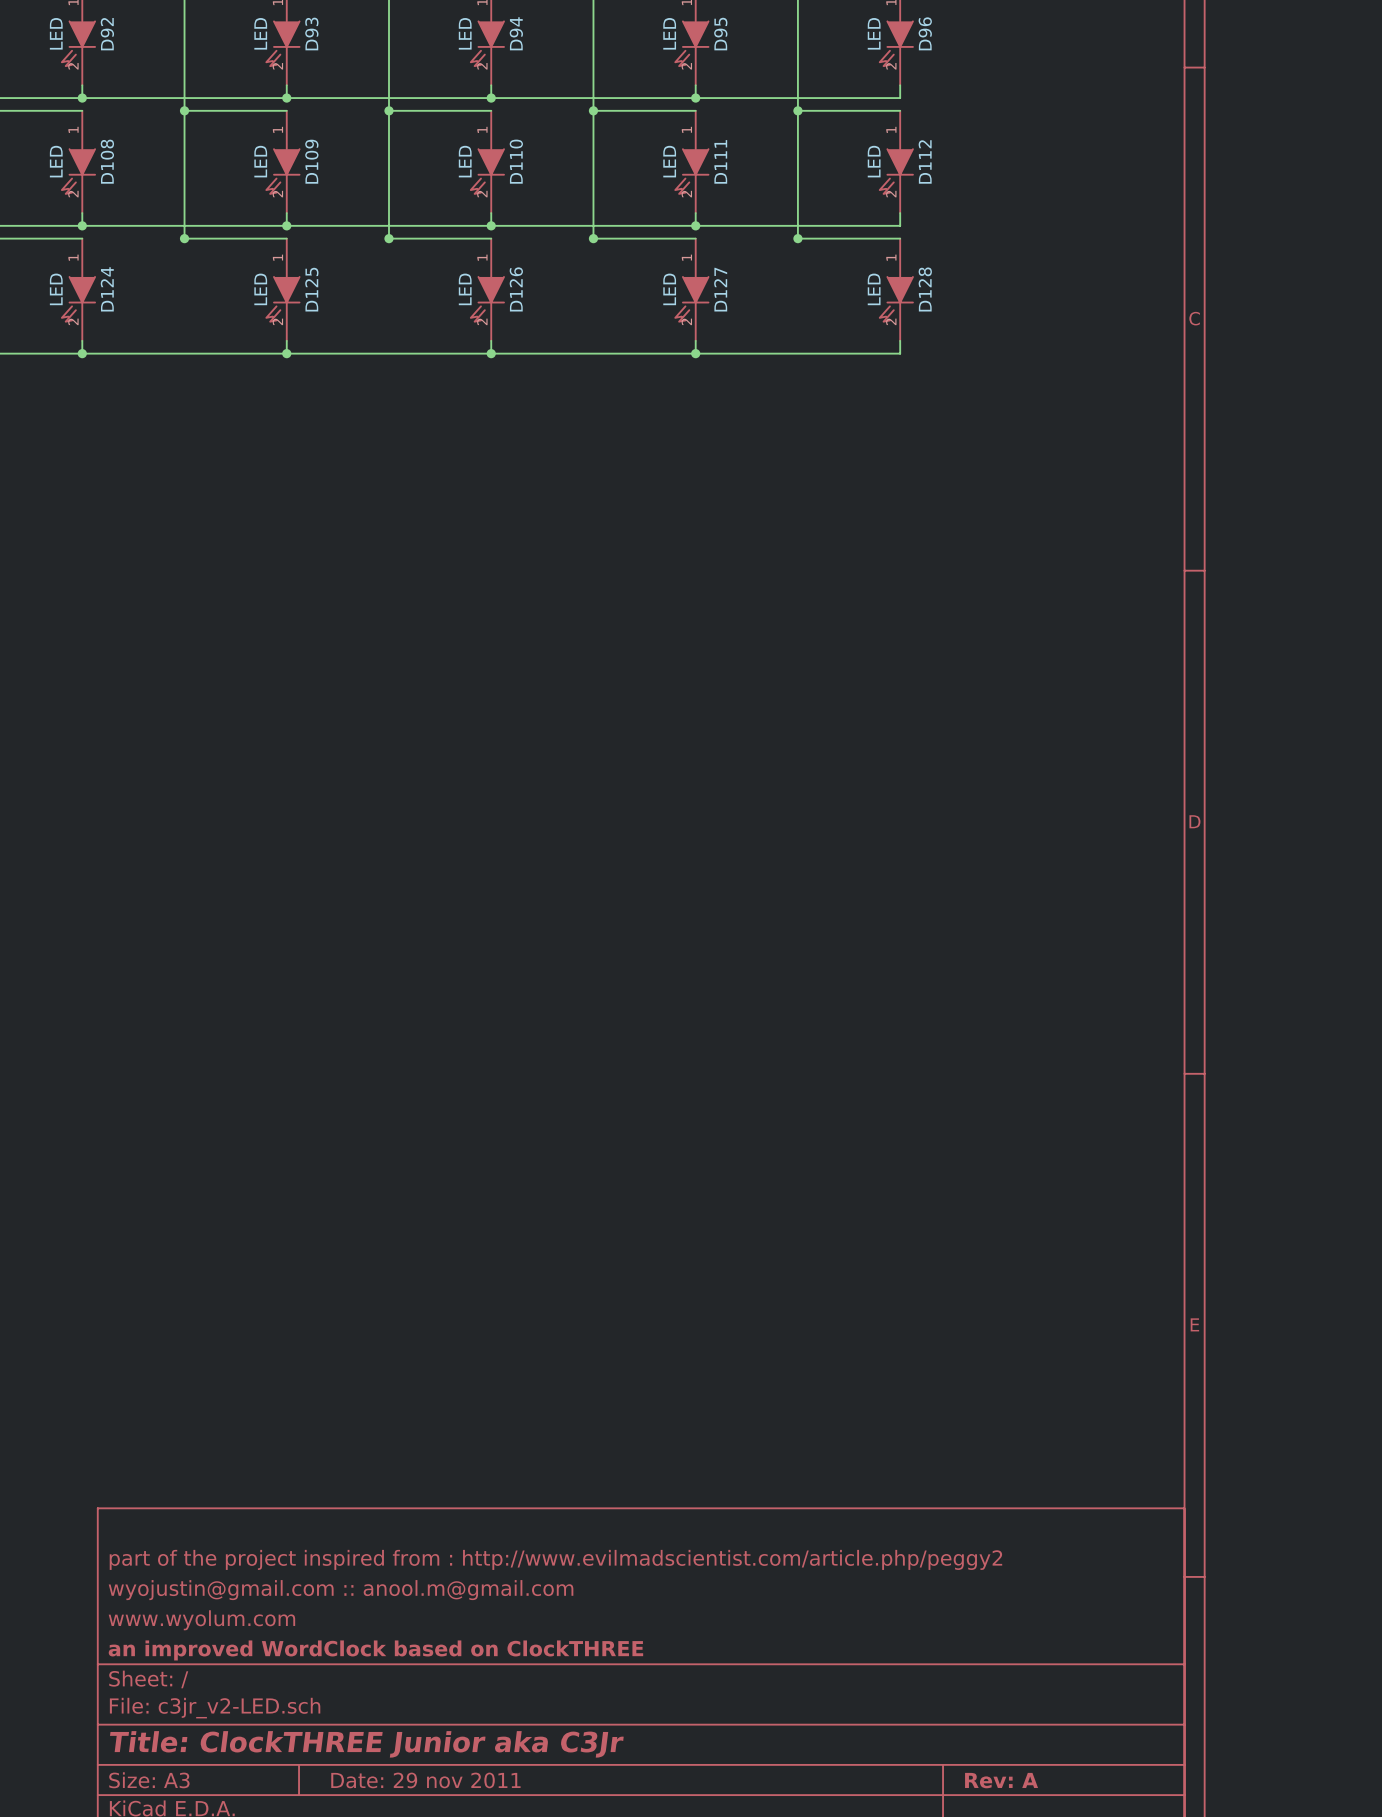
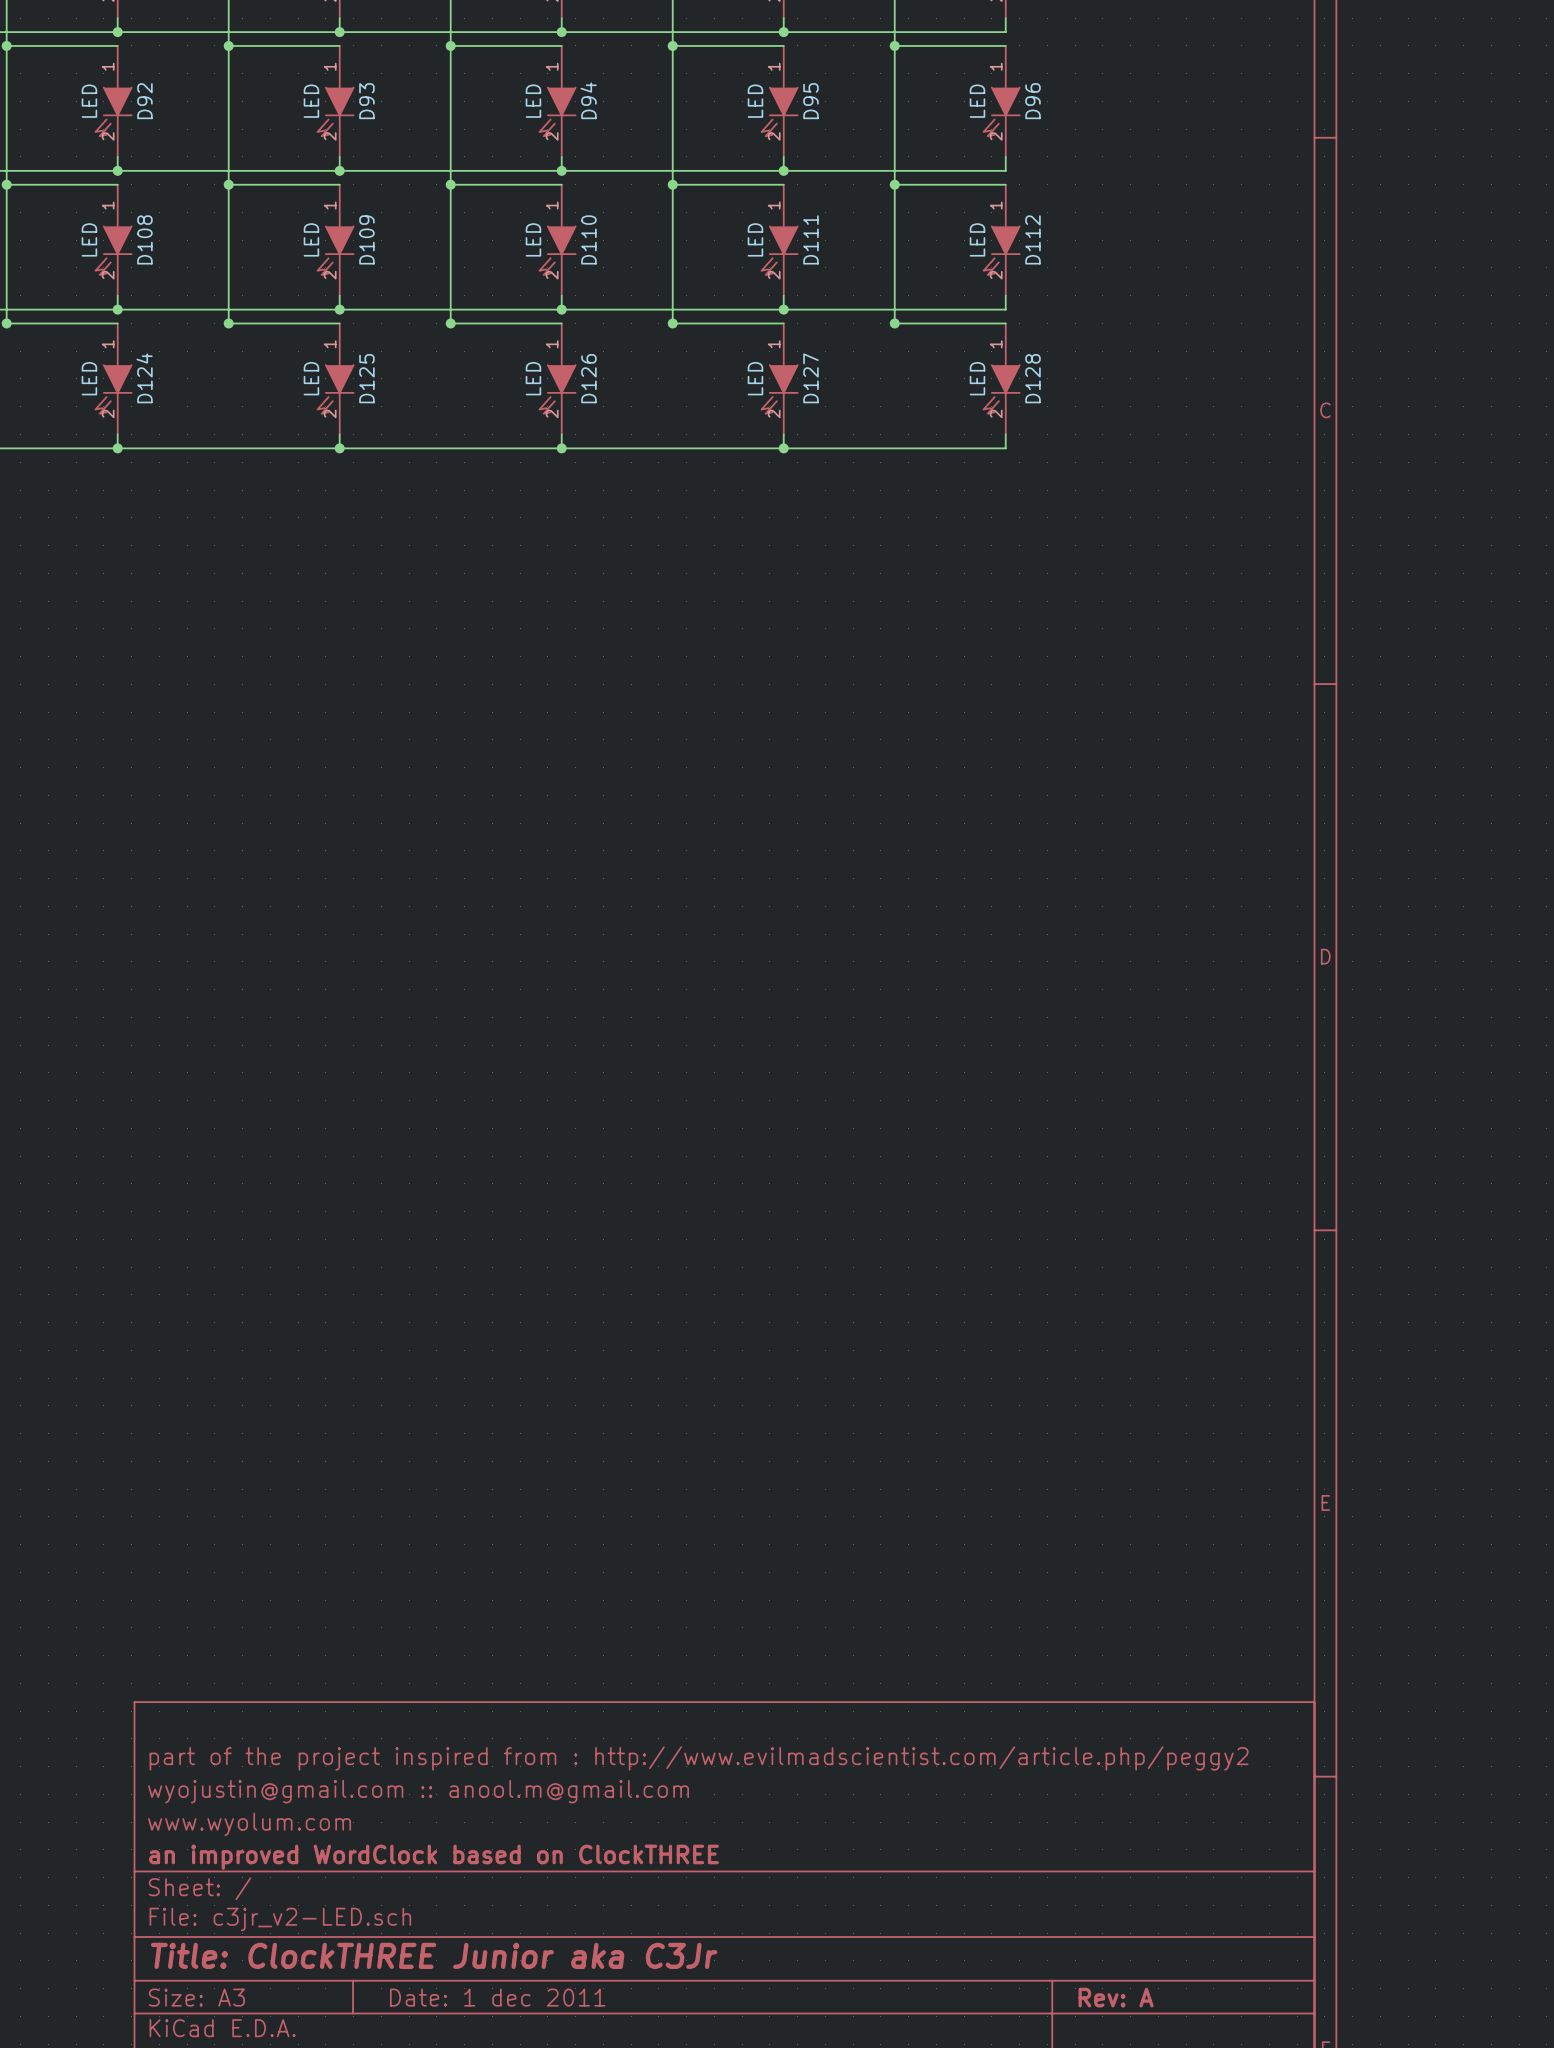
title block: Date: 29 nov 2011 (425, 1780) -> Date: 1 dec 2011 (497, 1997)

